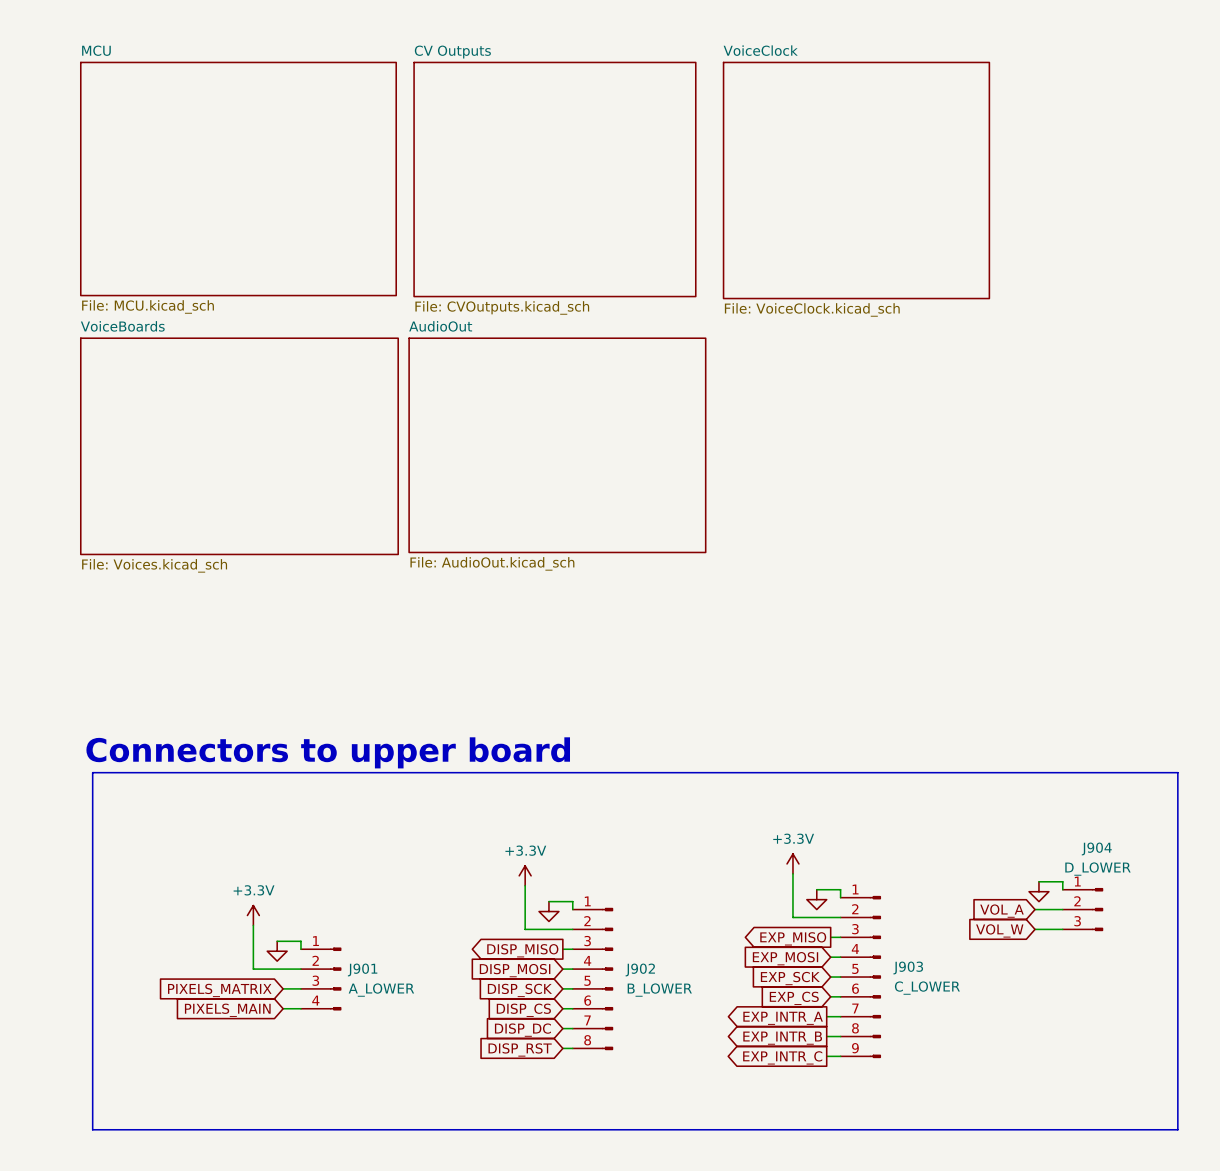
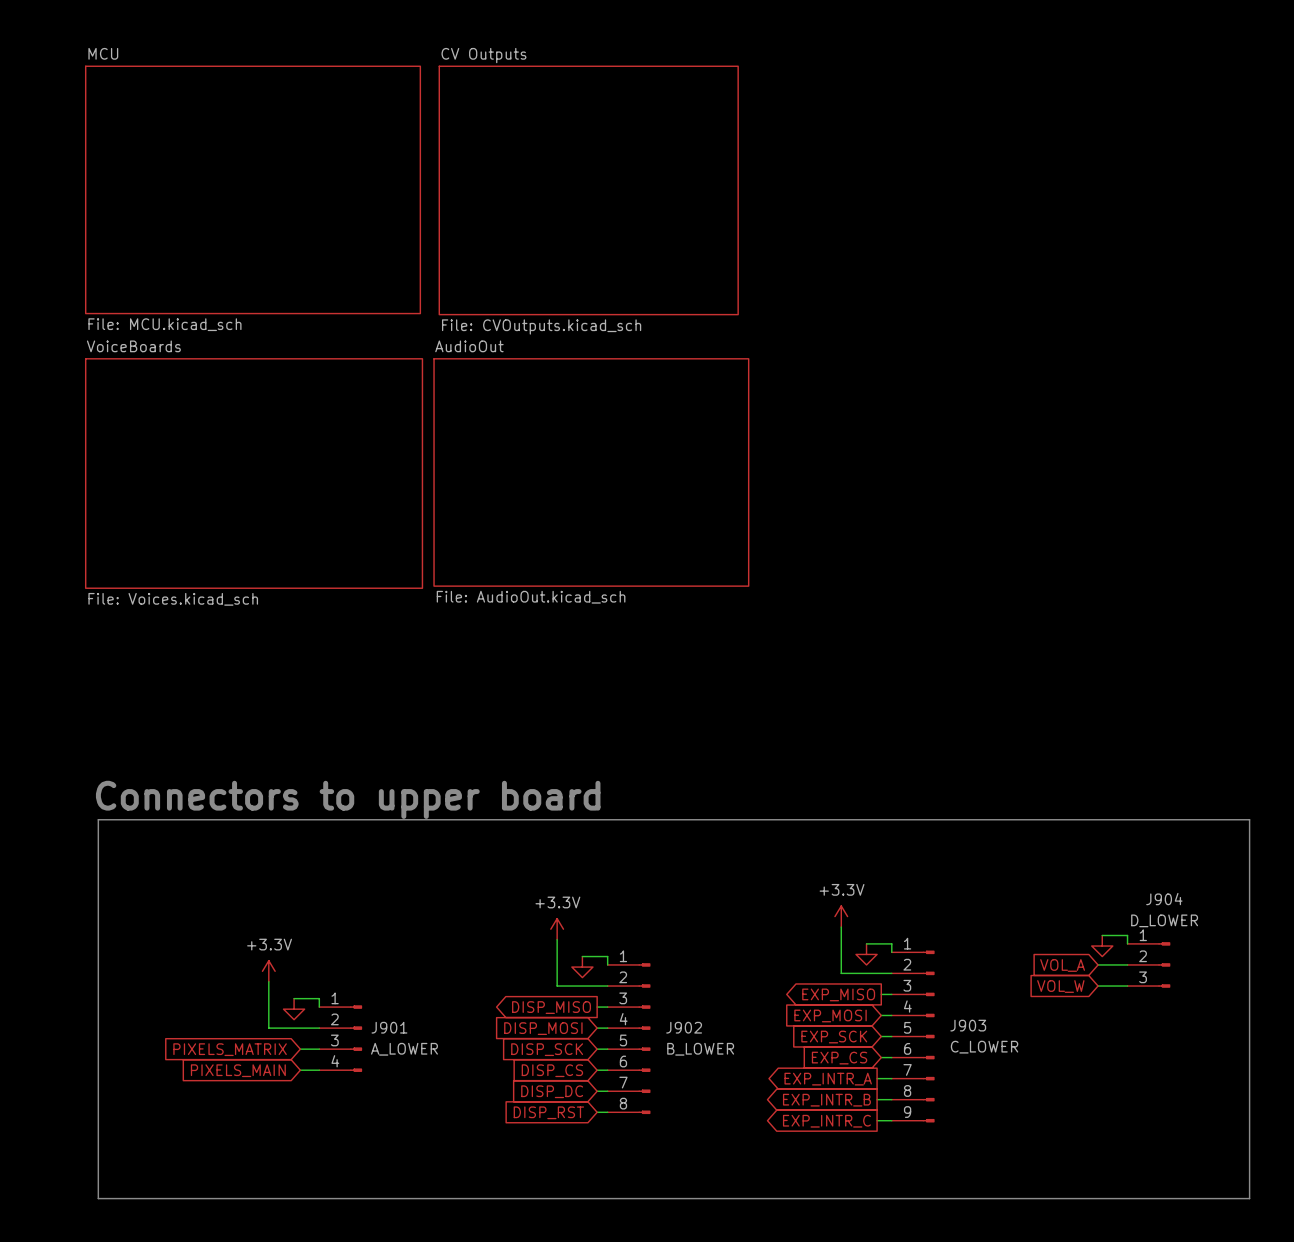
sheet VoiceClock: File: VoiceClock.kicad_sch (856, 180) -> none

